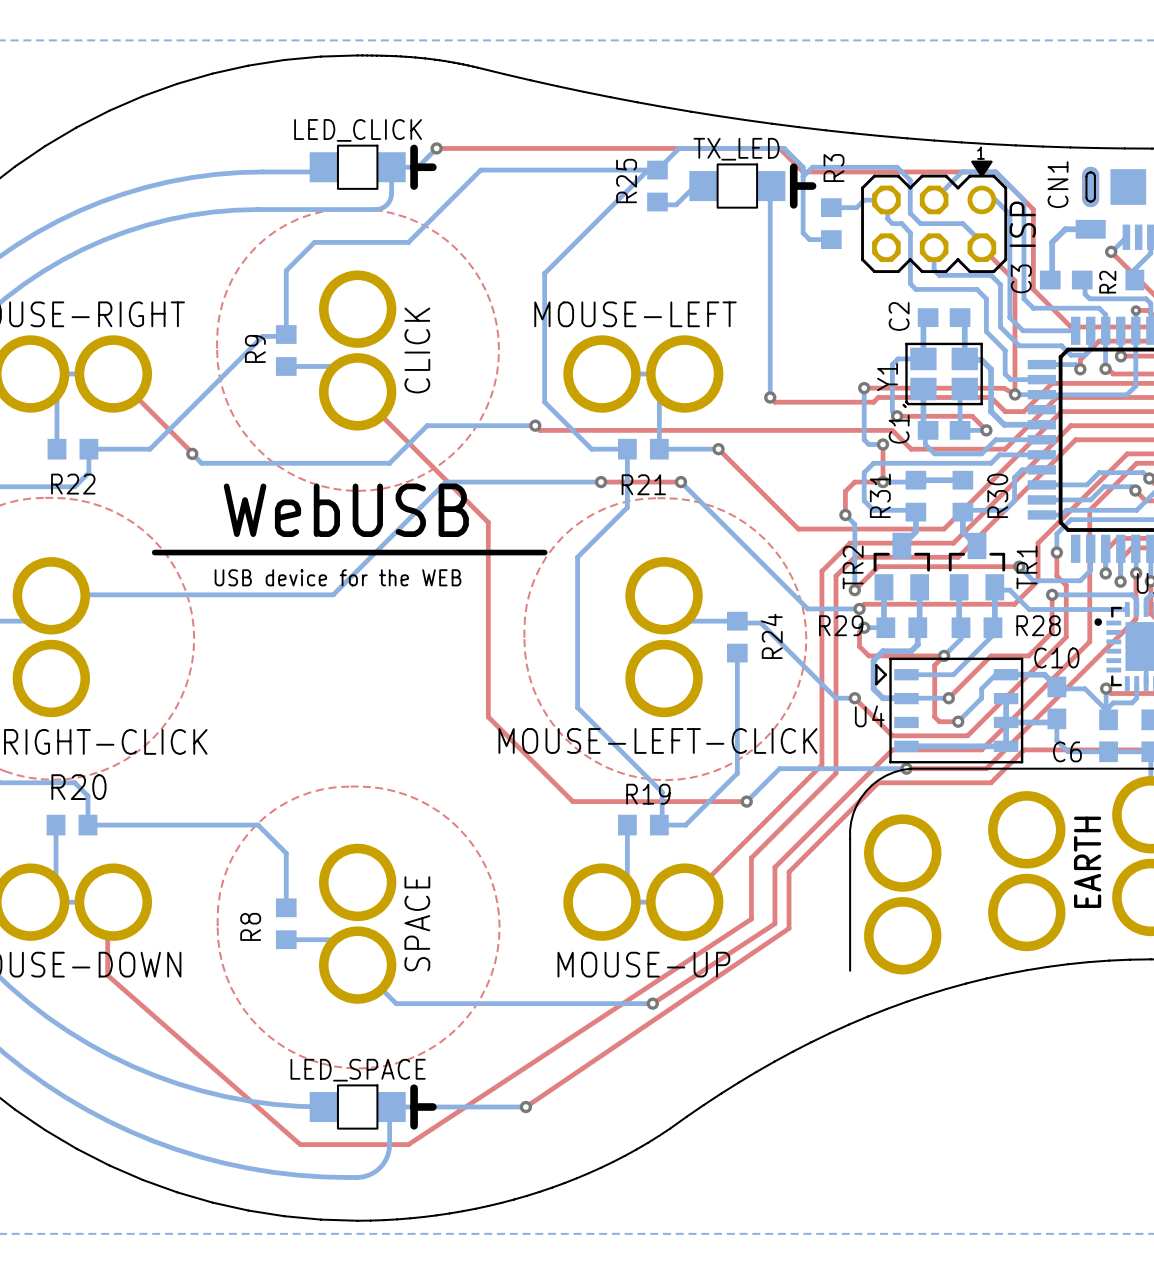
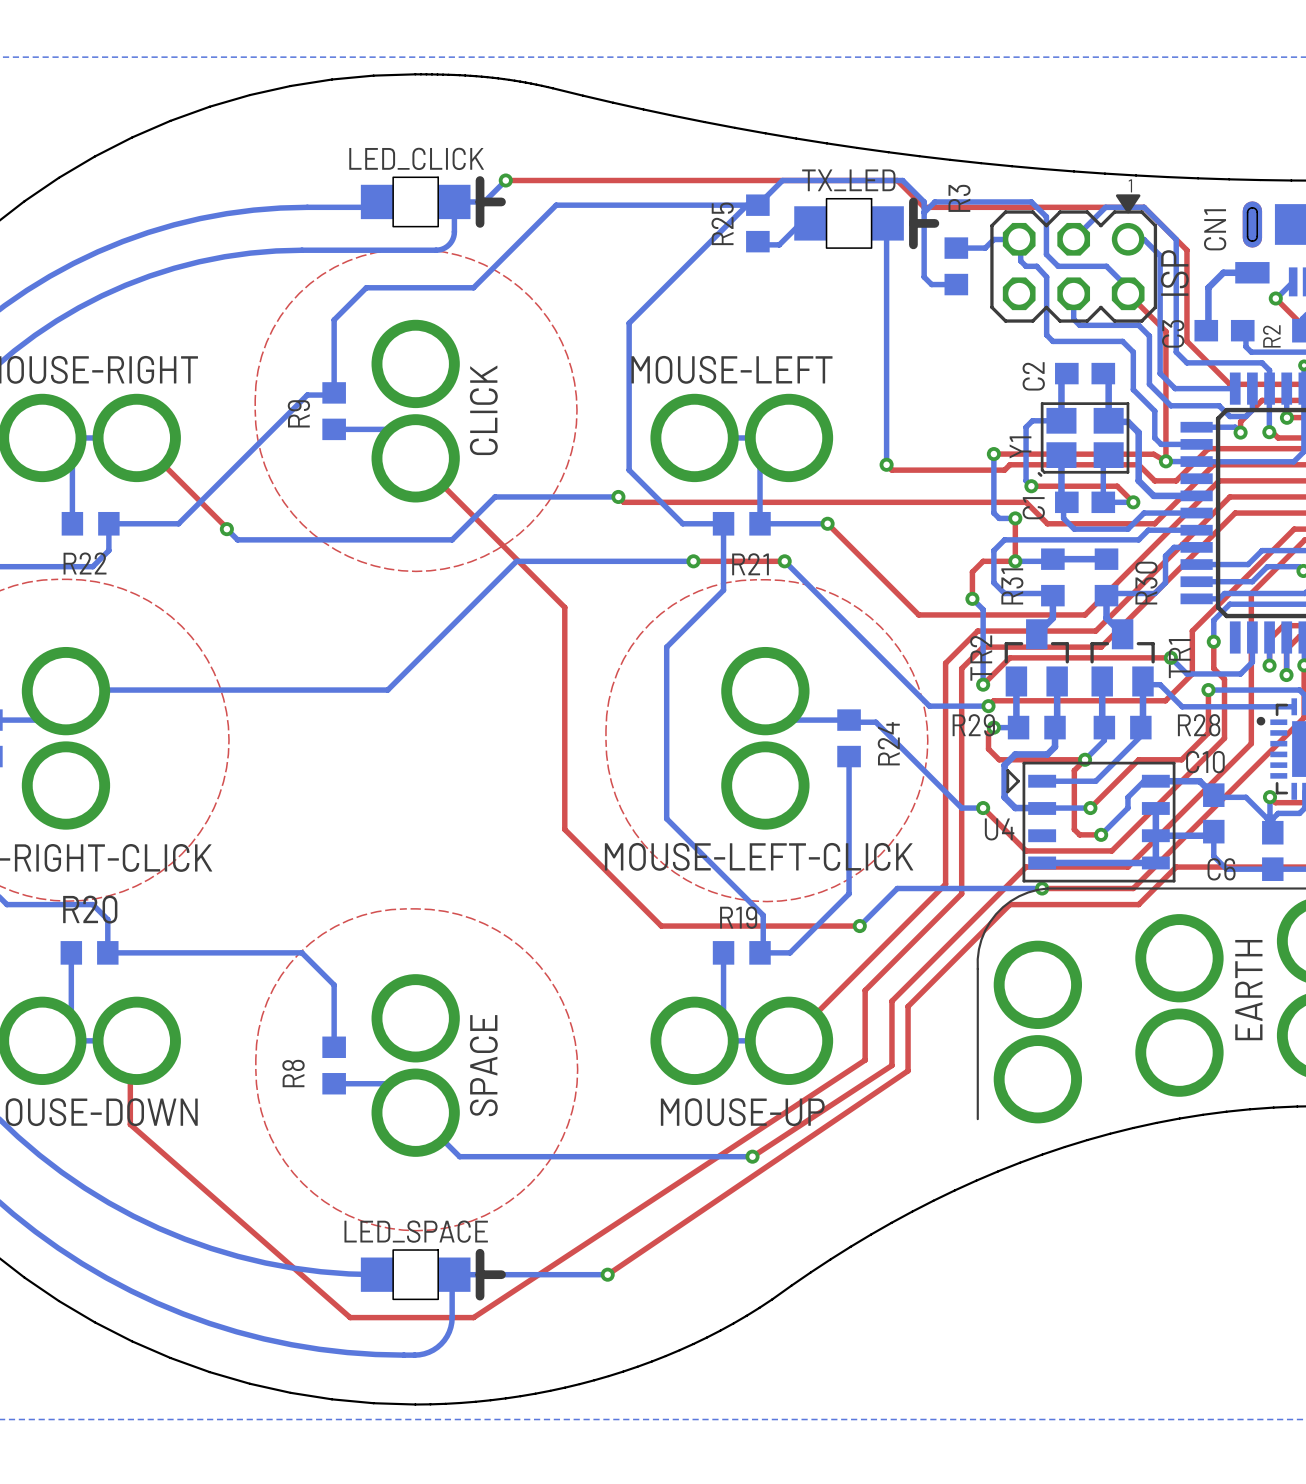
text: WebUSB (346, 510) -> none
line: (544, 552) (154, 552) -> none
text: USB device for the WEB (337, 577) -> none

